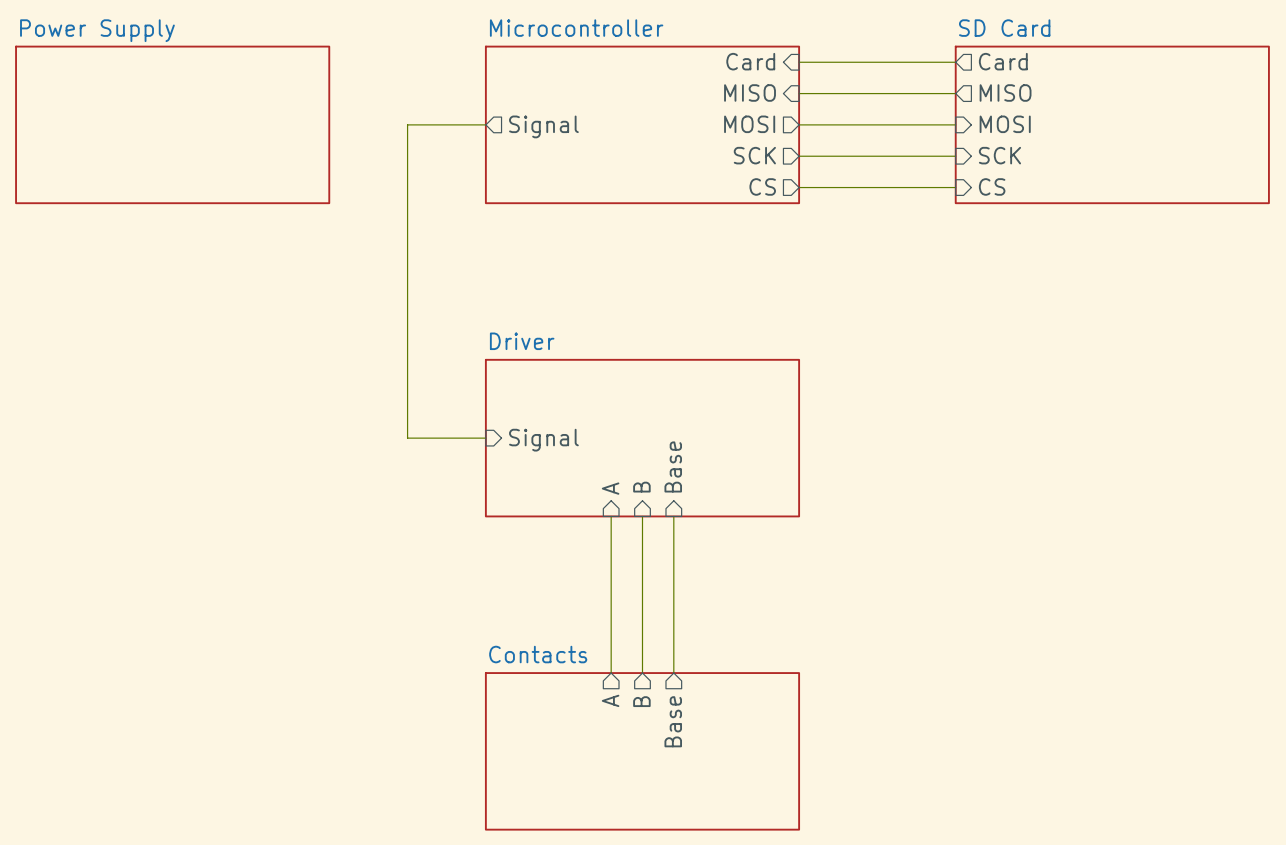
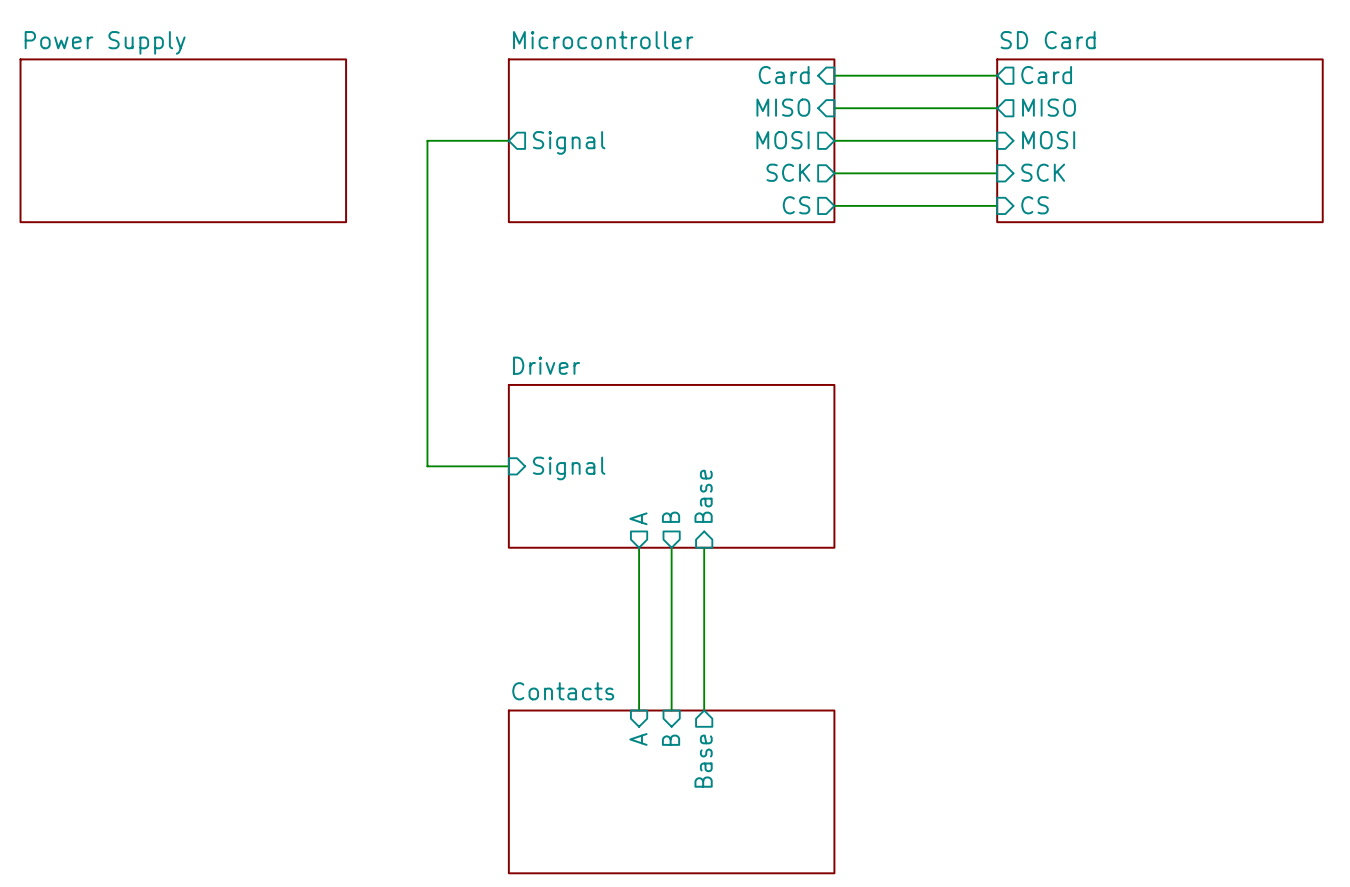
sheet pin shape: input (641, 487) -> output (671, 517)
sheet pin shape: input (610, 488) -> output (638, 518)
sheet pin shape: output (610, 700) -> input (638, 739)
sheet pin shape: output (641, 701) -> input (671, 740)

